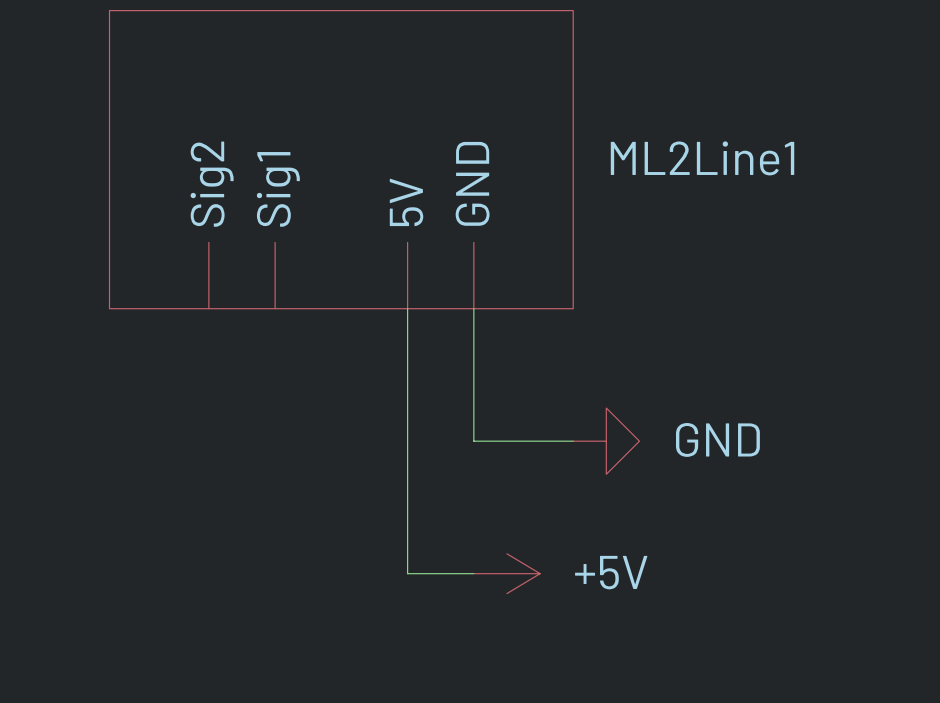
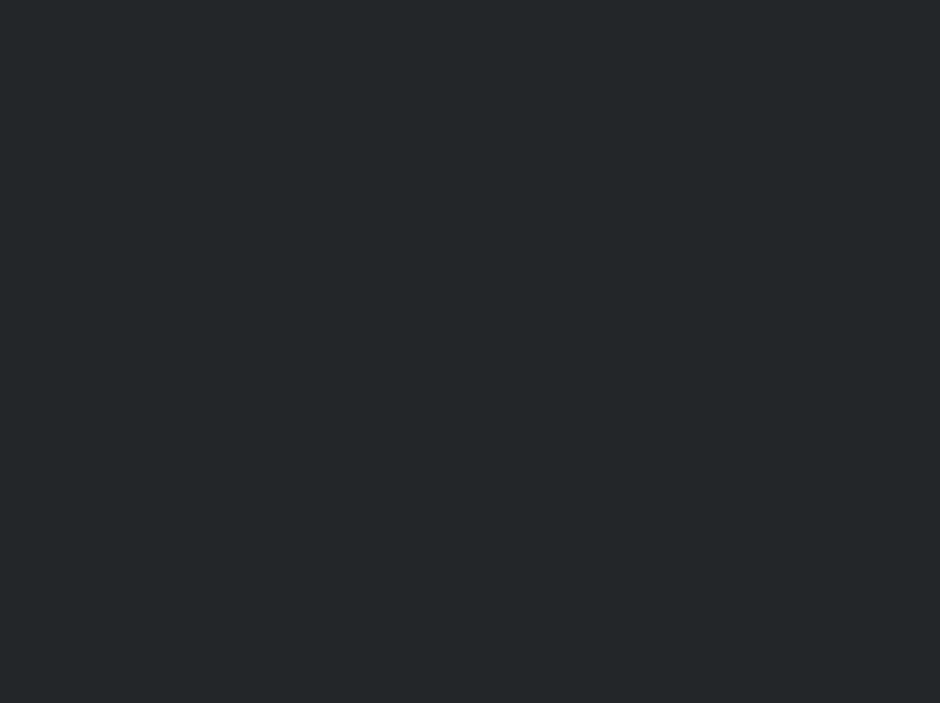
ML2Line1: (341, 159) -> none
wire: (407, 308) (407, 573) (473, 573) -> none
wire: (473, 308) (473, 441) (573, 441) -> none
power symbol: GND (606, 441) -> none
power symbol: +5V (506, 573) -> none

